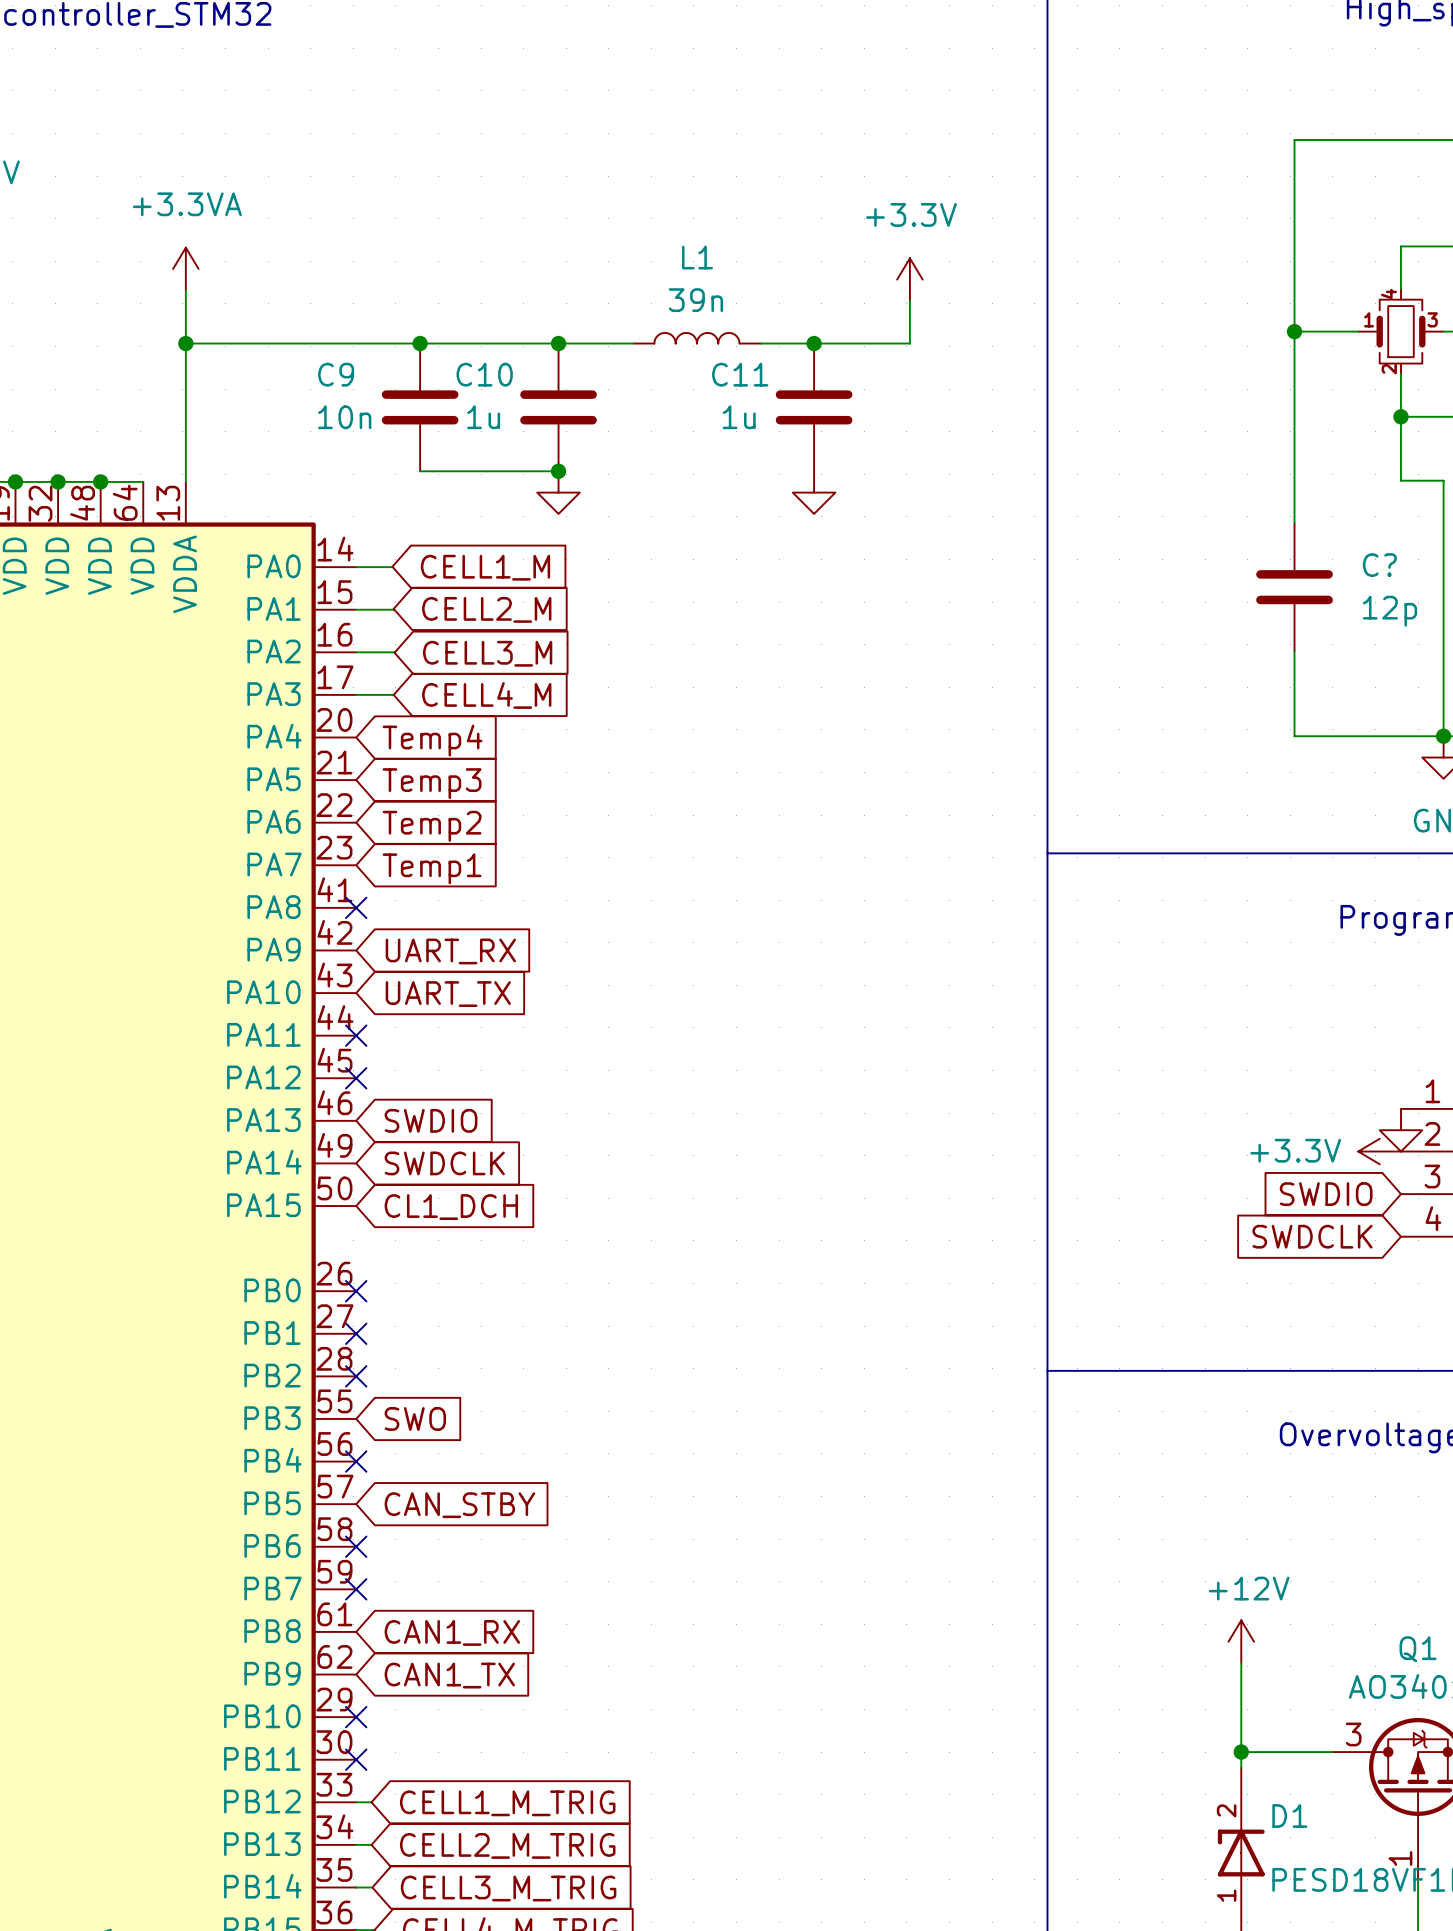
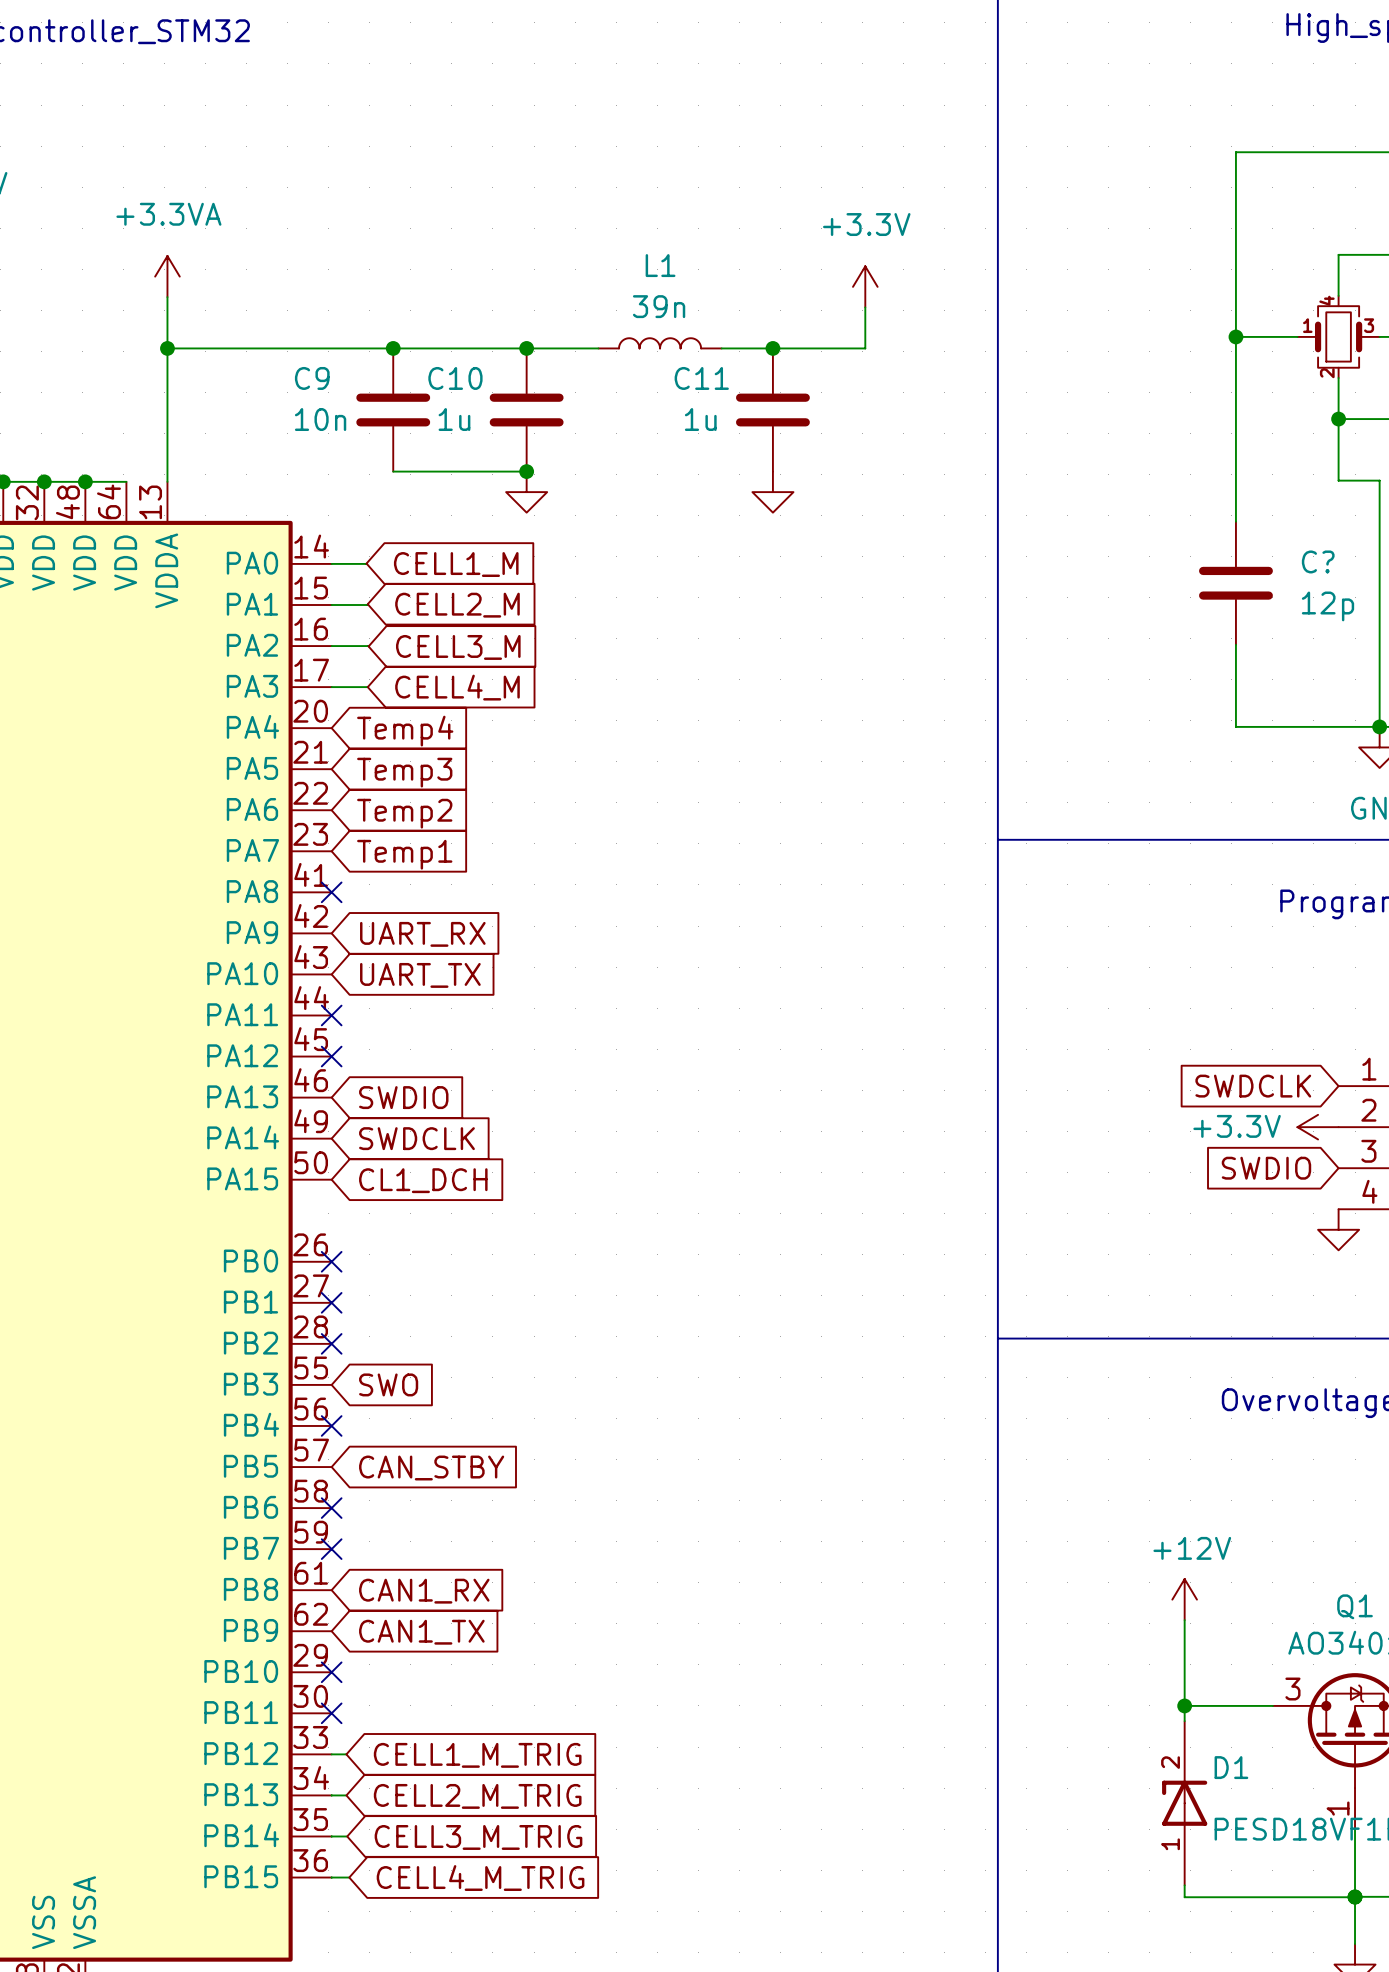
power symbol position: (1401, 1130) -> (1338, 1229)
global label position: SWDCLK (1312, 1236) -> SWDCLK (1253, 1086)

